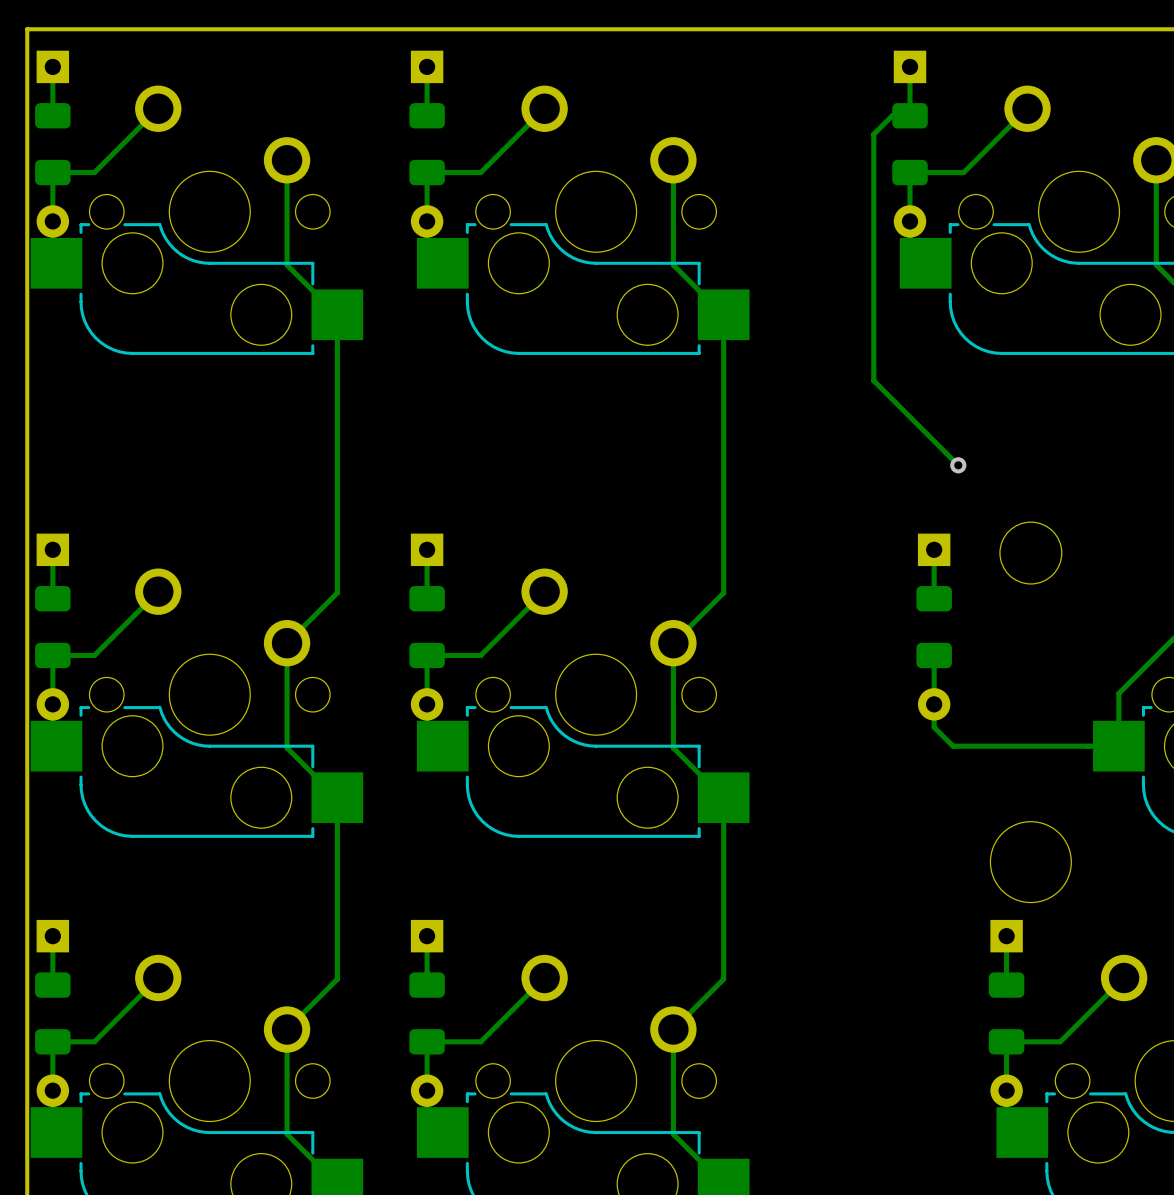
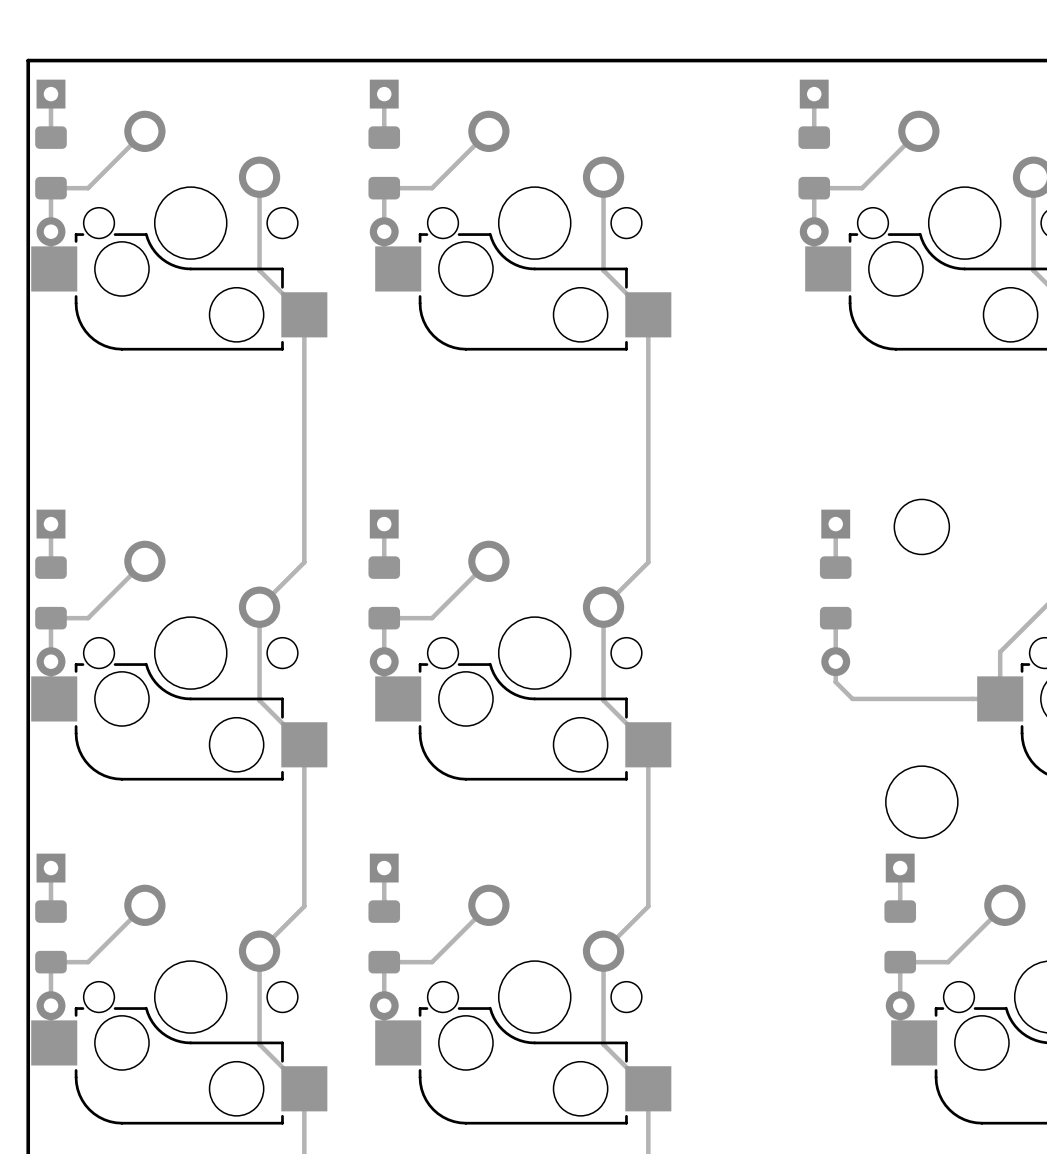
track: (910, 115) (892, 115) (873, 134) (873, 380) (958, 465) -> none
via: (958, 465) -> none

